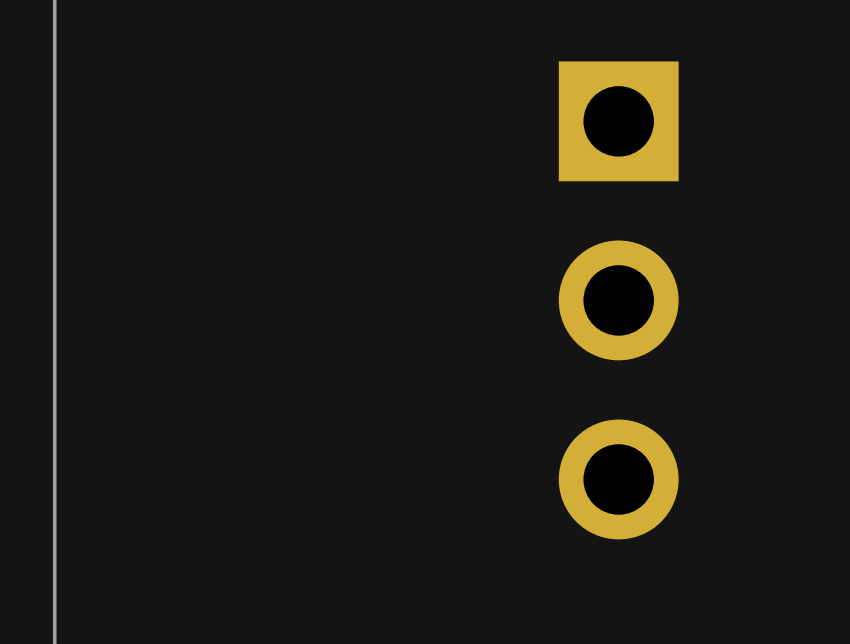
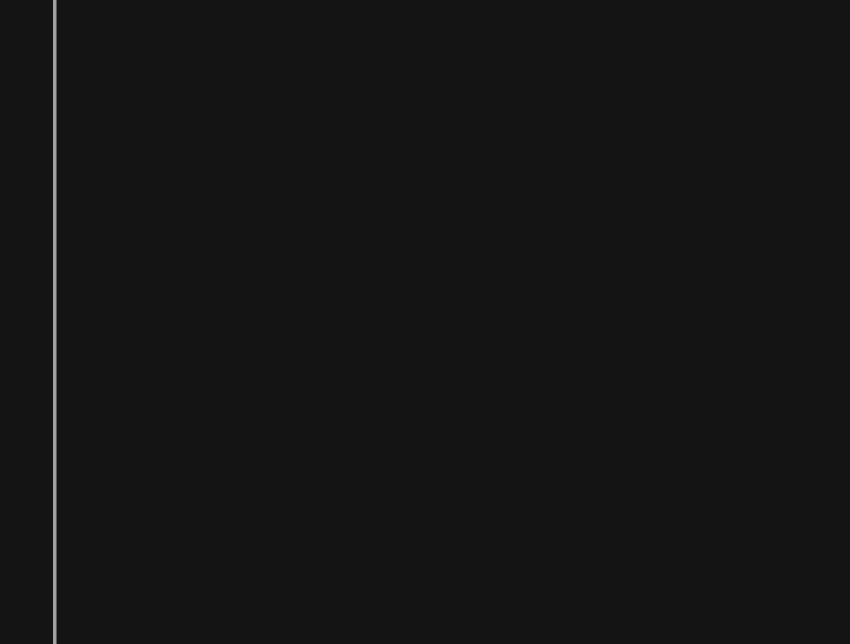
part: (618, 300) -> none

